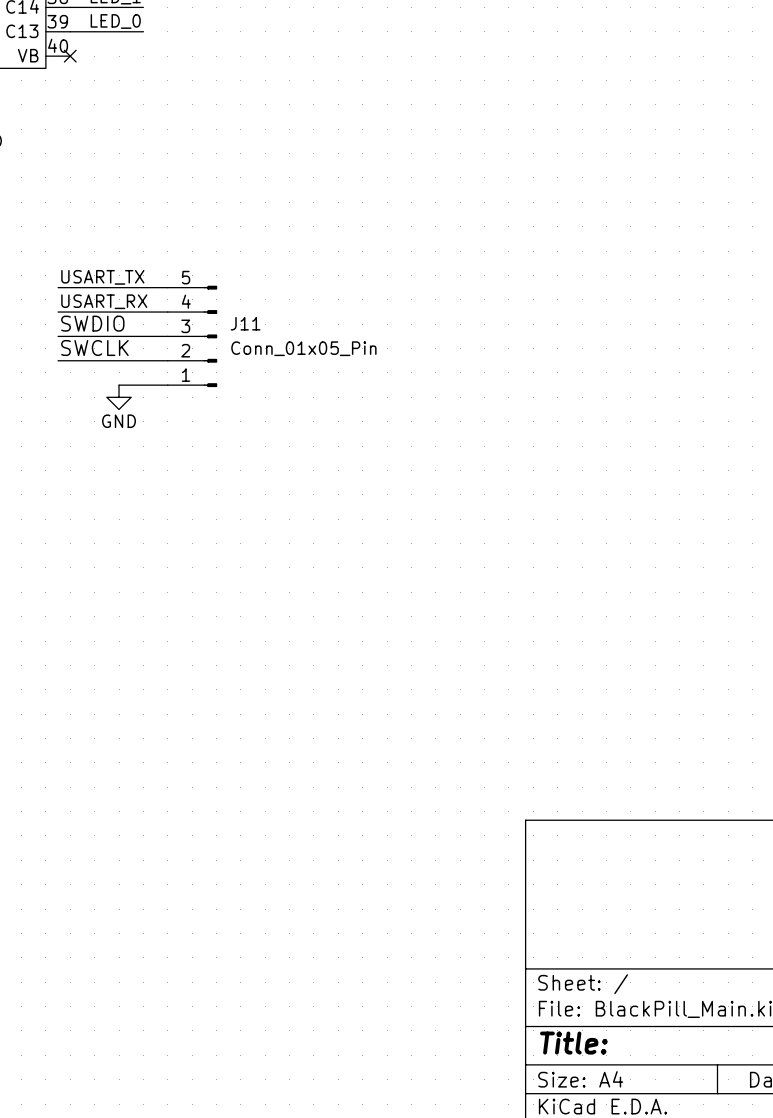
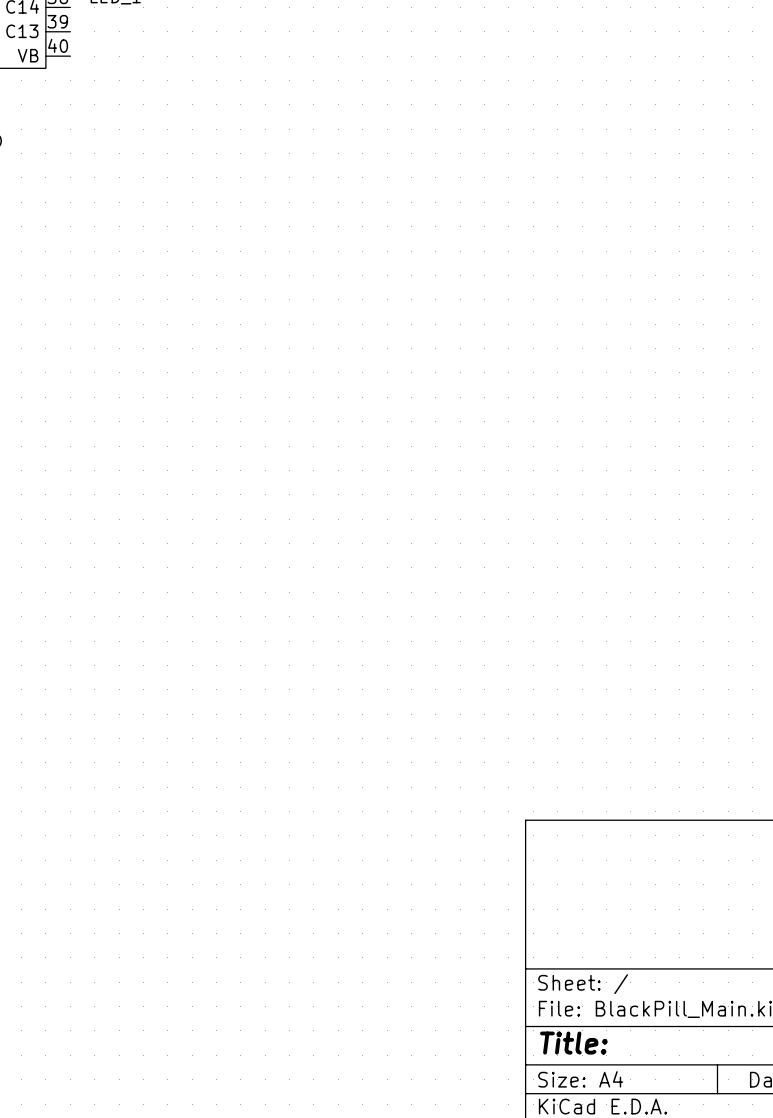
wire: (70, 7) (143, 7) -> none
label: LED_0 (115, 21) -> none
wire: (70, 31) (143, 31) -> none
no-connect mark: (70, 56) -> none
label: USART_TX (102, 277) -> none
wire: (58, 287) (167, 287) -> none
label: USART_RX (104, 301) -> none
wire: (58, 312) (167, 312) -> none
label: SWDIO (92, 323) -> none
wire: (58, 336) (167, 336) -> none
J11: Conn_01x05_Pin (192, 336) -> none
label: SWCLK (94, 348) -> none
wire: (58, 360) (167, 360) -> none
wire: (119, 385) (167, 385) -> none
power symbol: GND (119, 397) -> none

